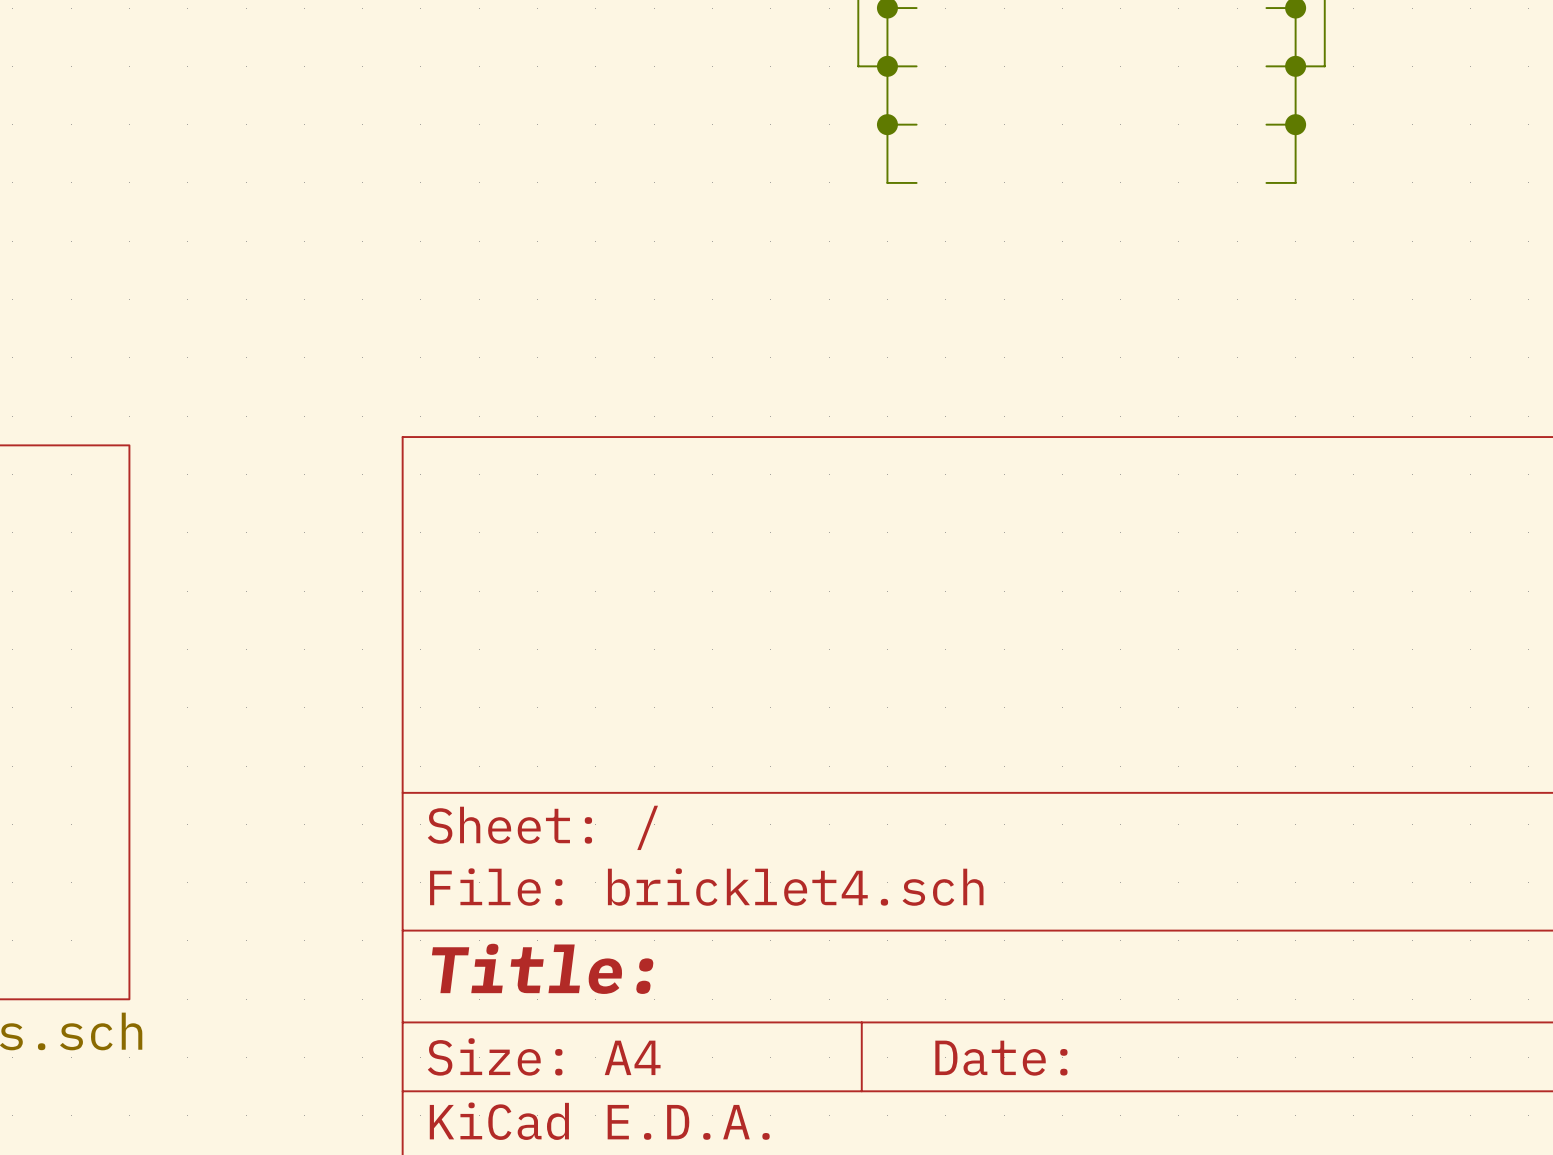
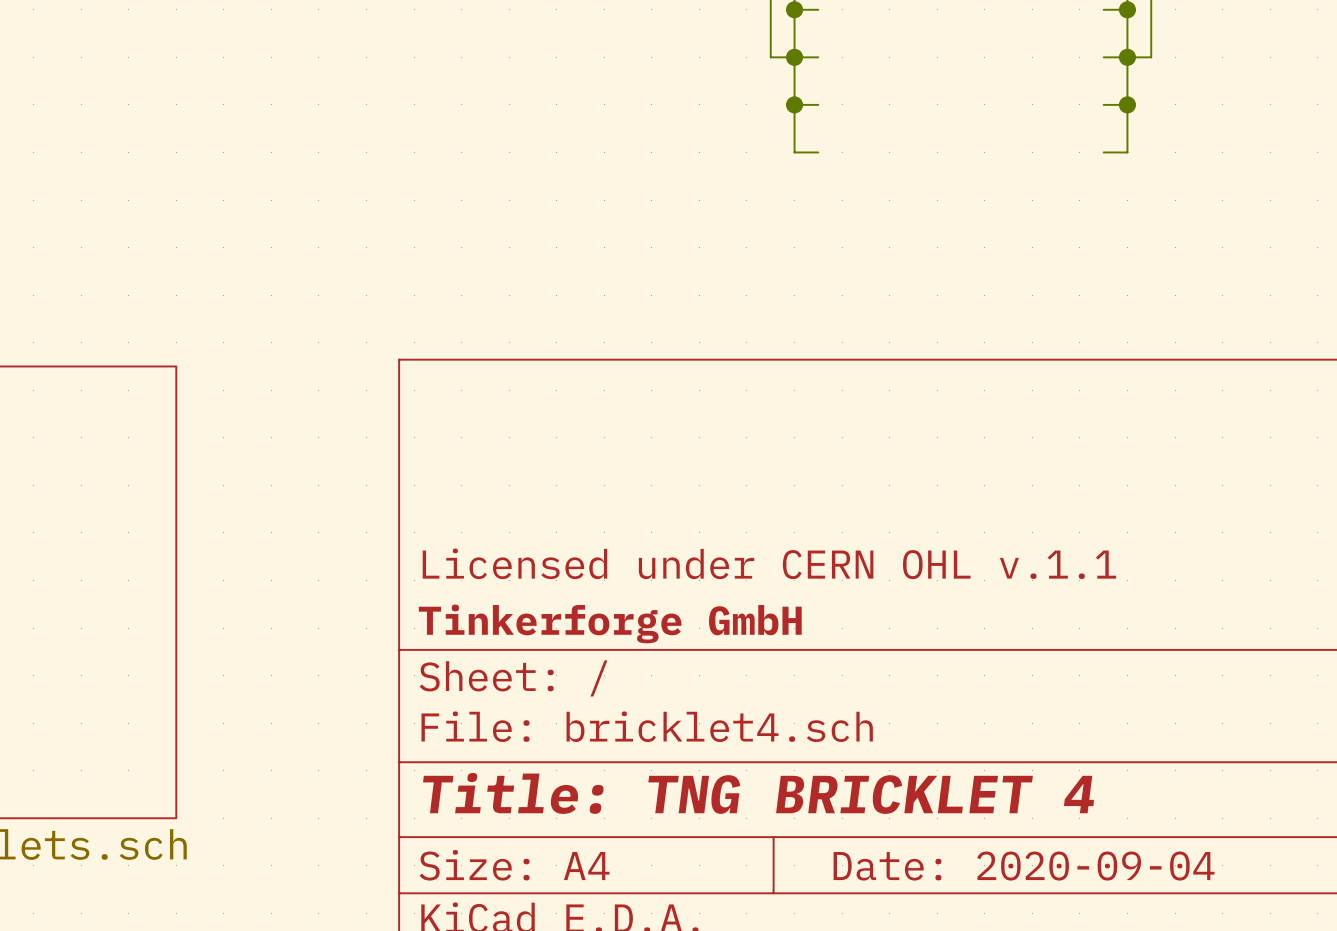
title block: none -> Licensed under CERN OHL v.1.1 (769, 563)
title block: none -> Tinkerforge GmbH (610, 623)
title block: Title: (542, 968) -> Title: TNG BRICKLET 4 (758, 793)
title block: Date: (1001, 1058) -> Date: 2020-09-04 (1024, 866)

